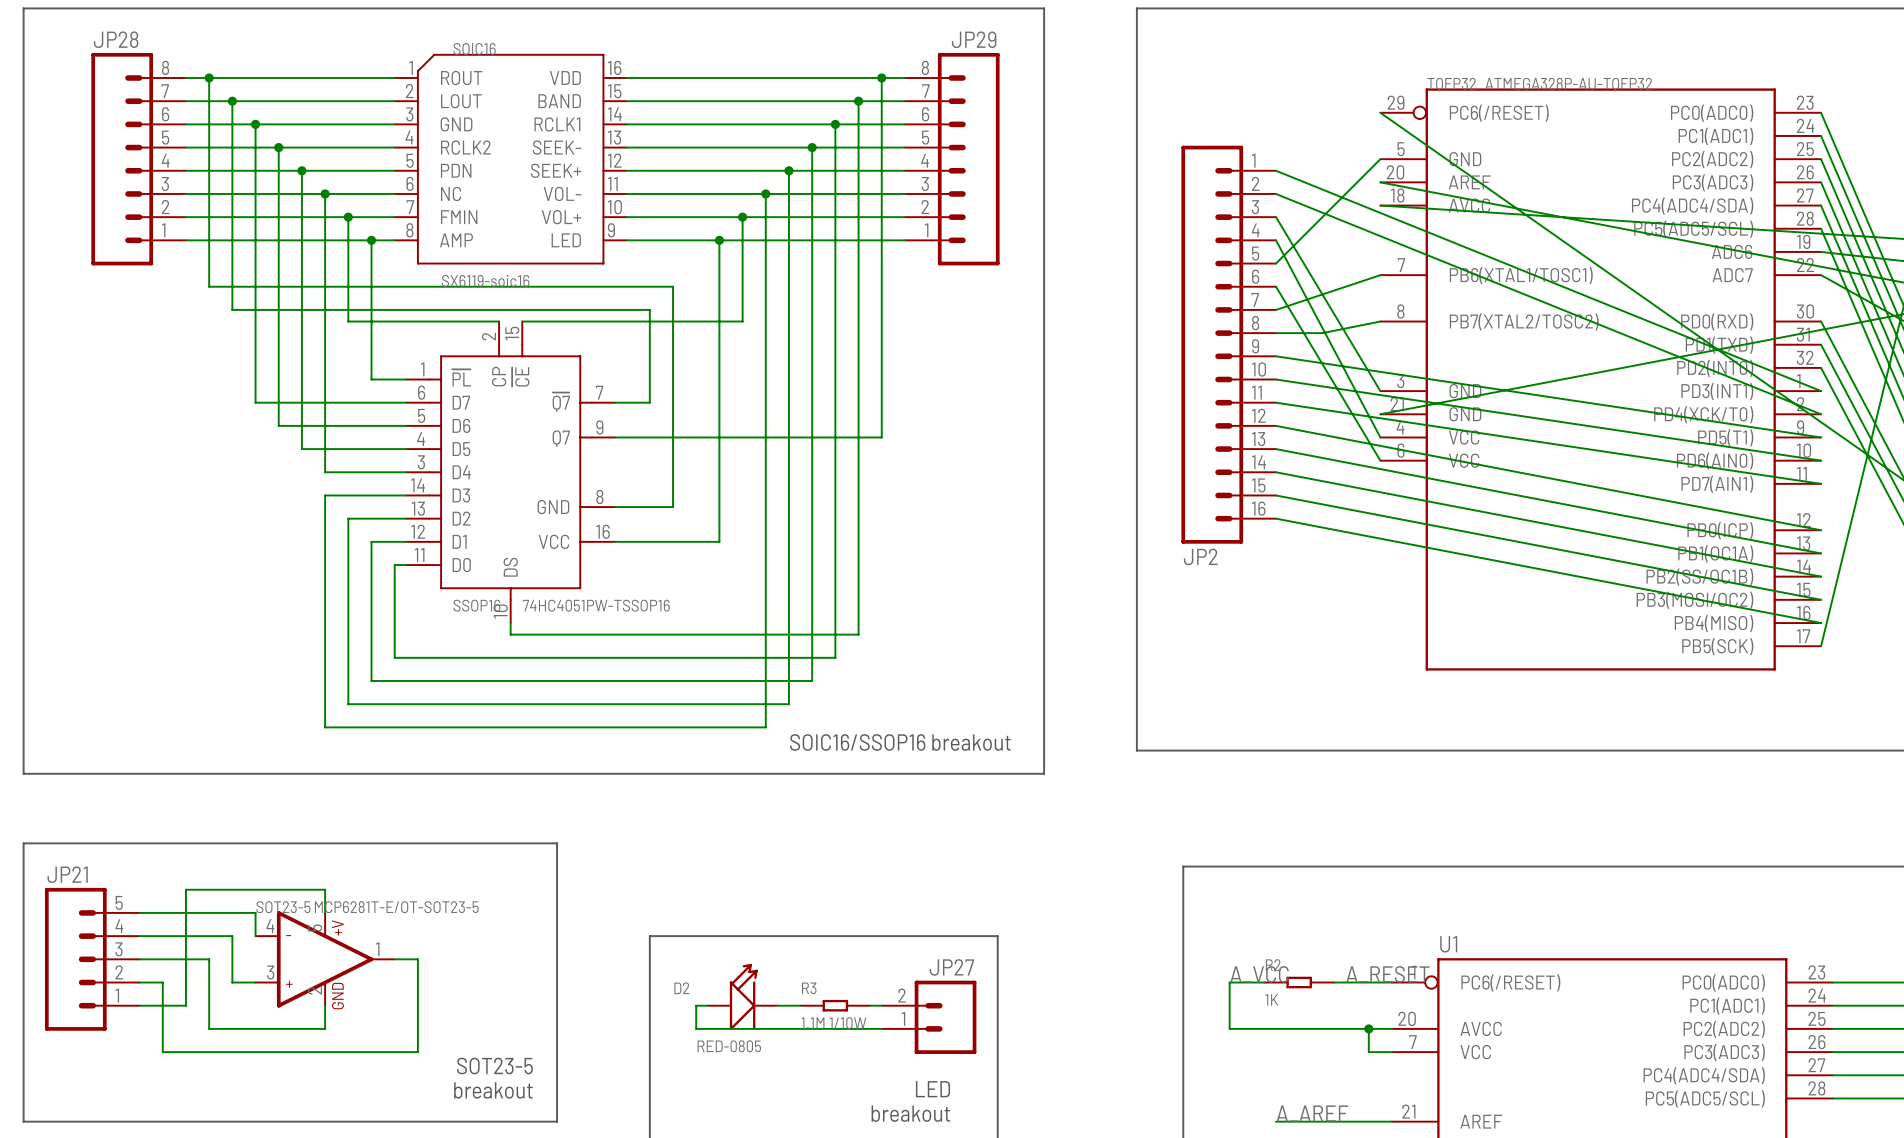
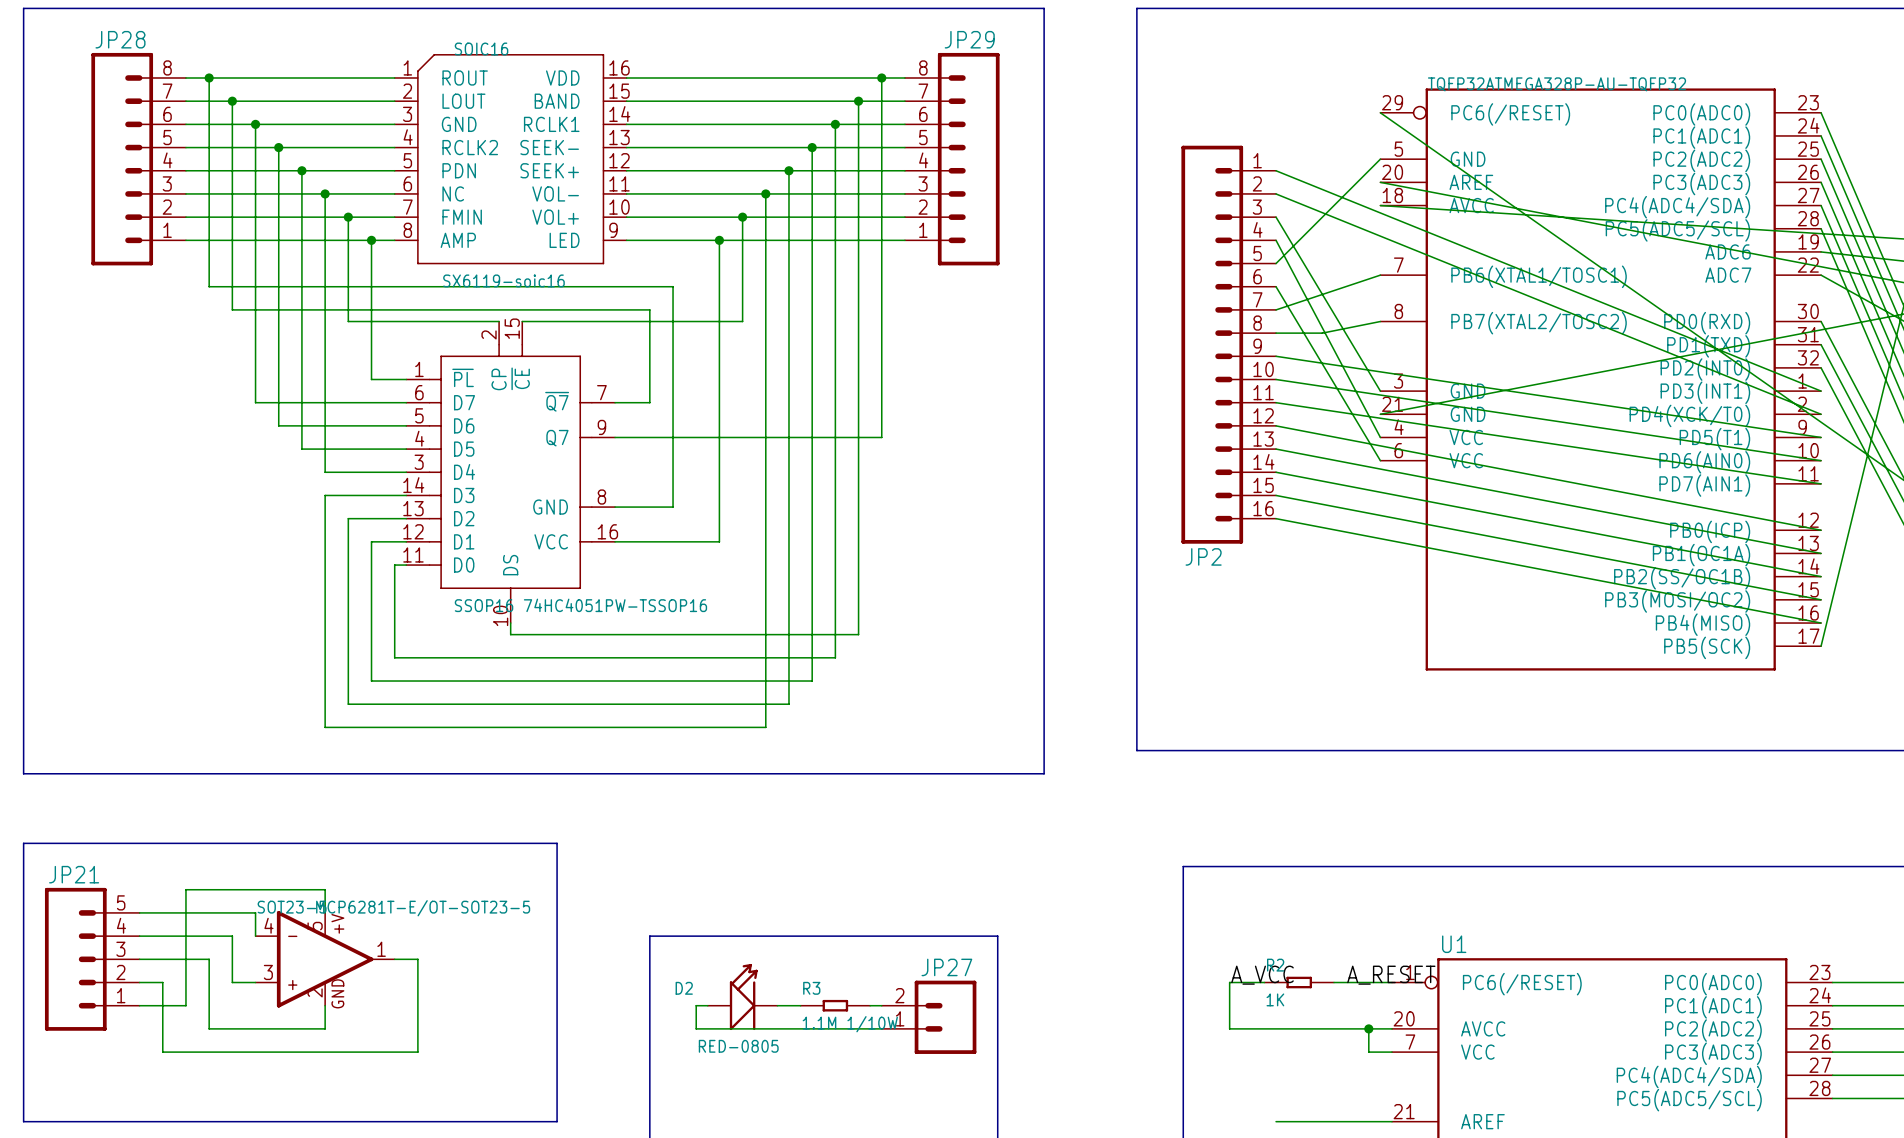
text: SOIC16/SSOP16 breakout (900, 742) -> none
text: SOT23-5 (494, 1066) -> none
text: LED (932, 1089) -> none
text: breakout (493, 1090) -> none
text: breakout (910, 1113) -> none
label: A_AREF (1312, 1113) -> none

